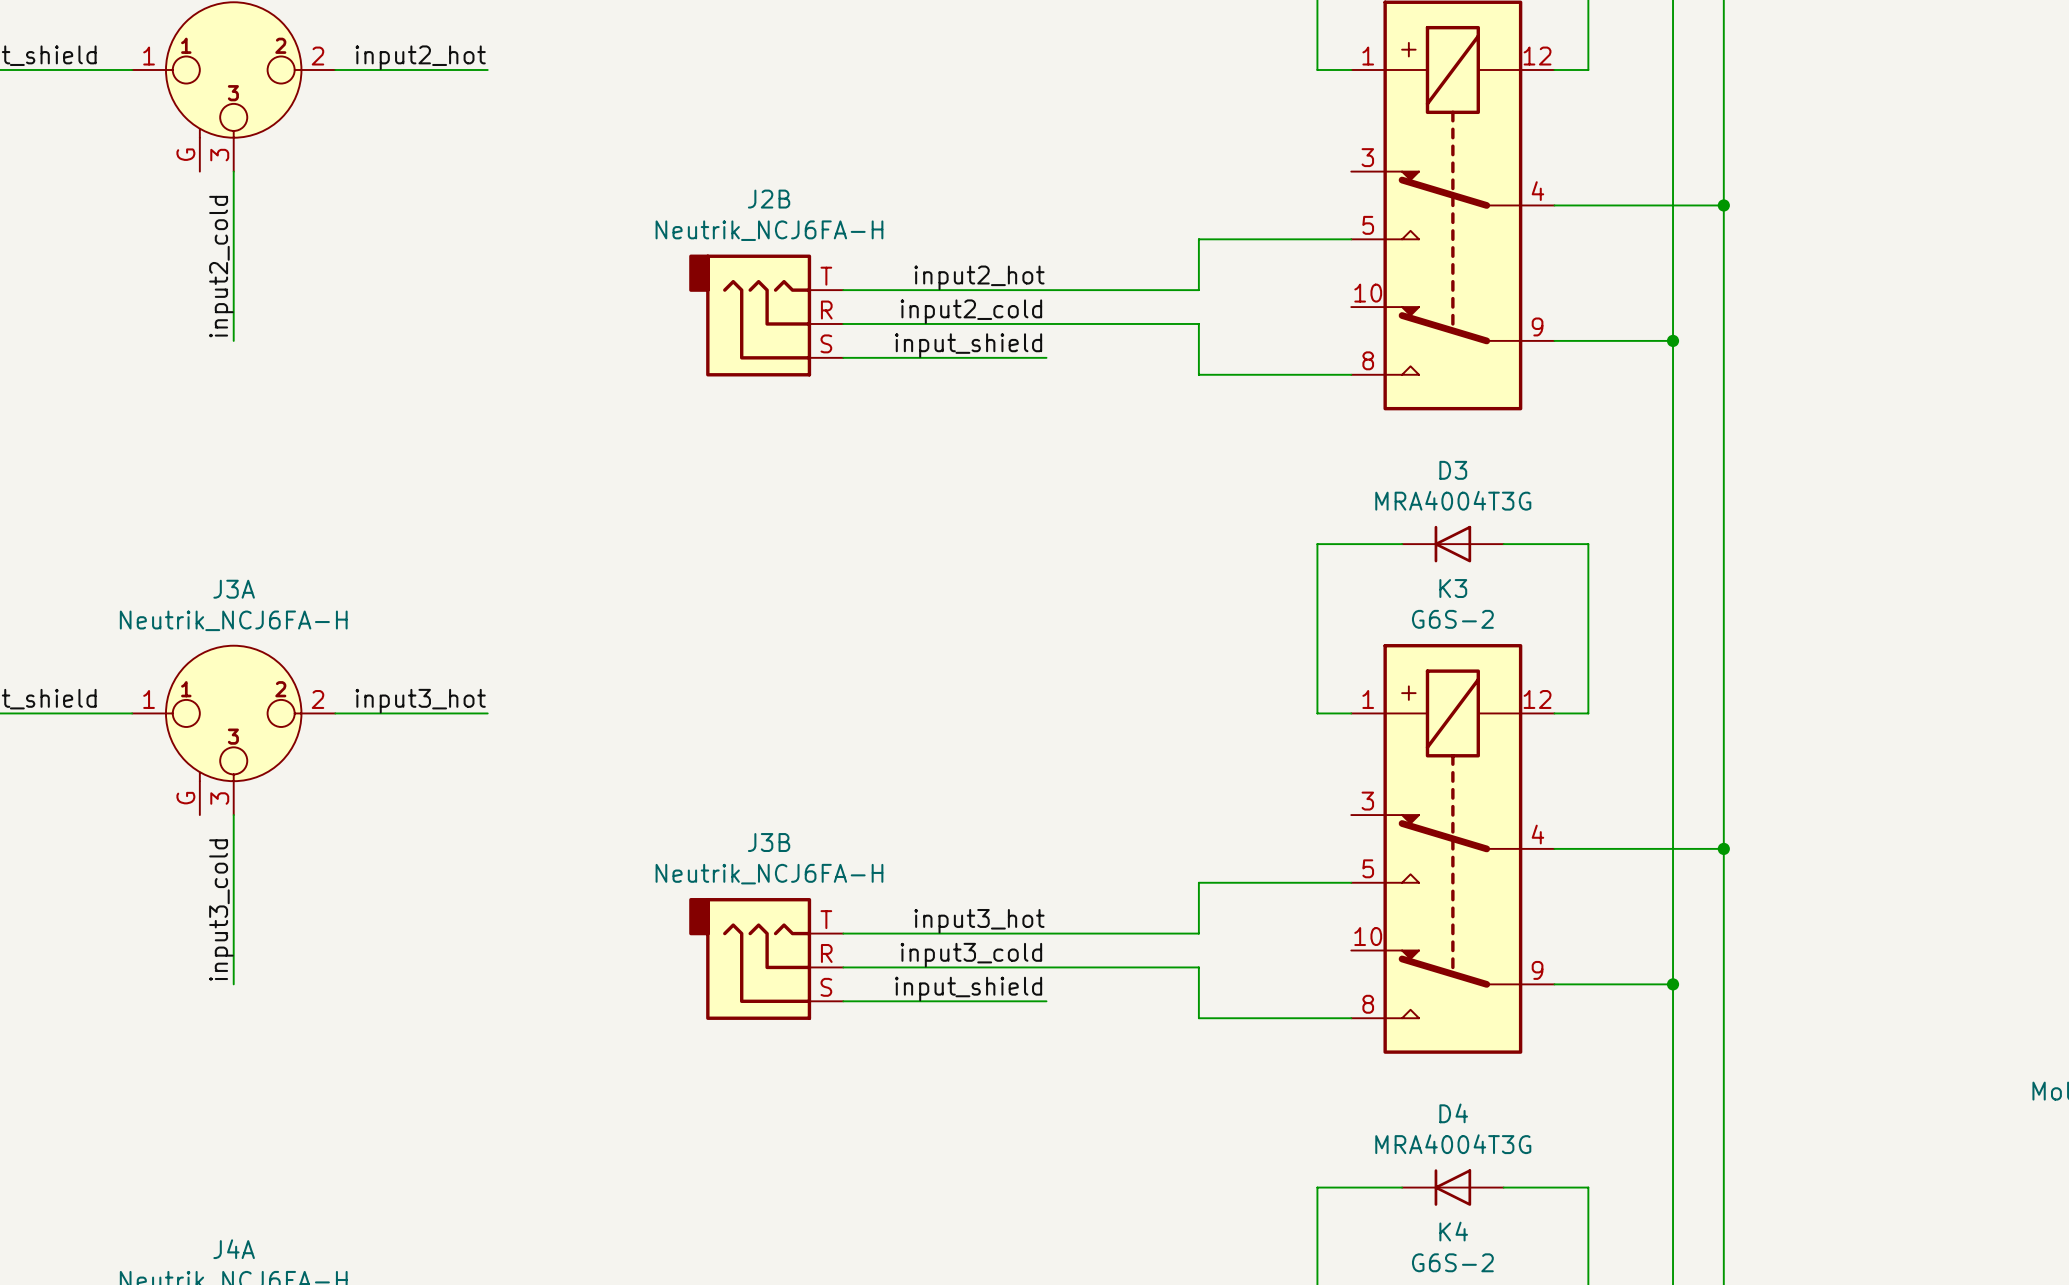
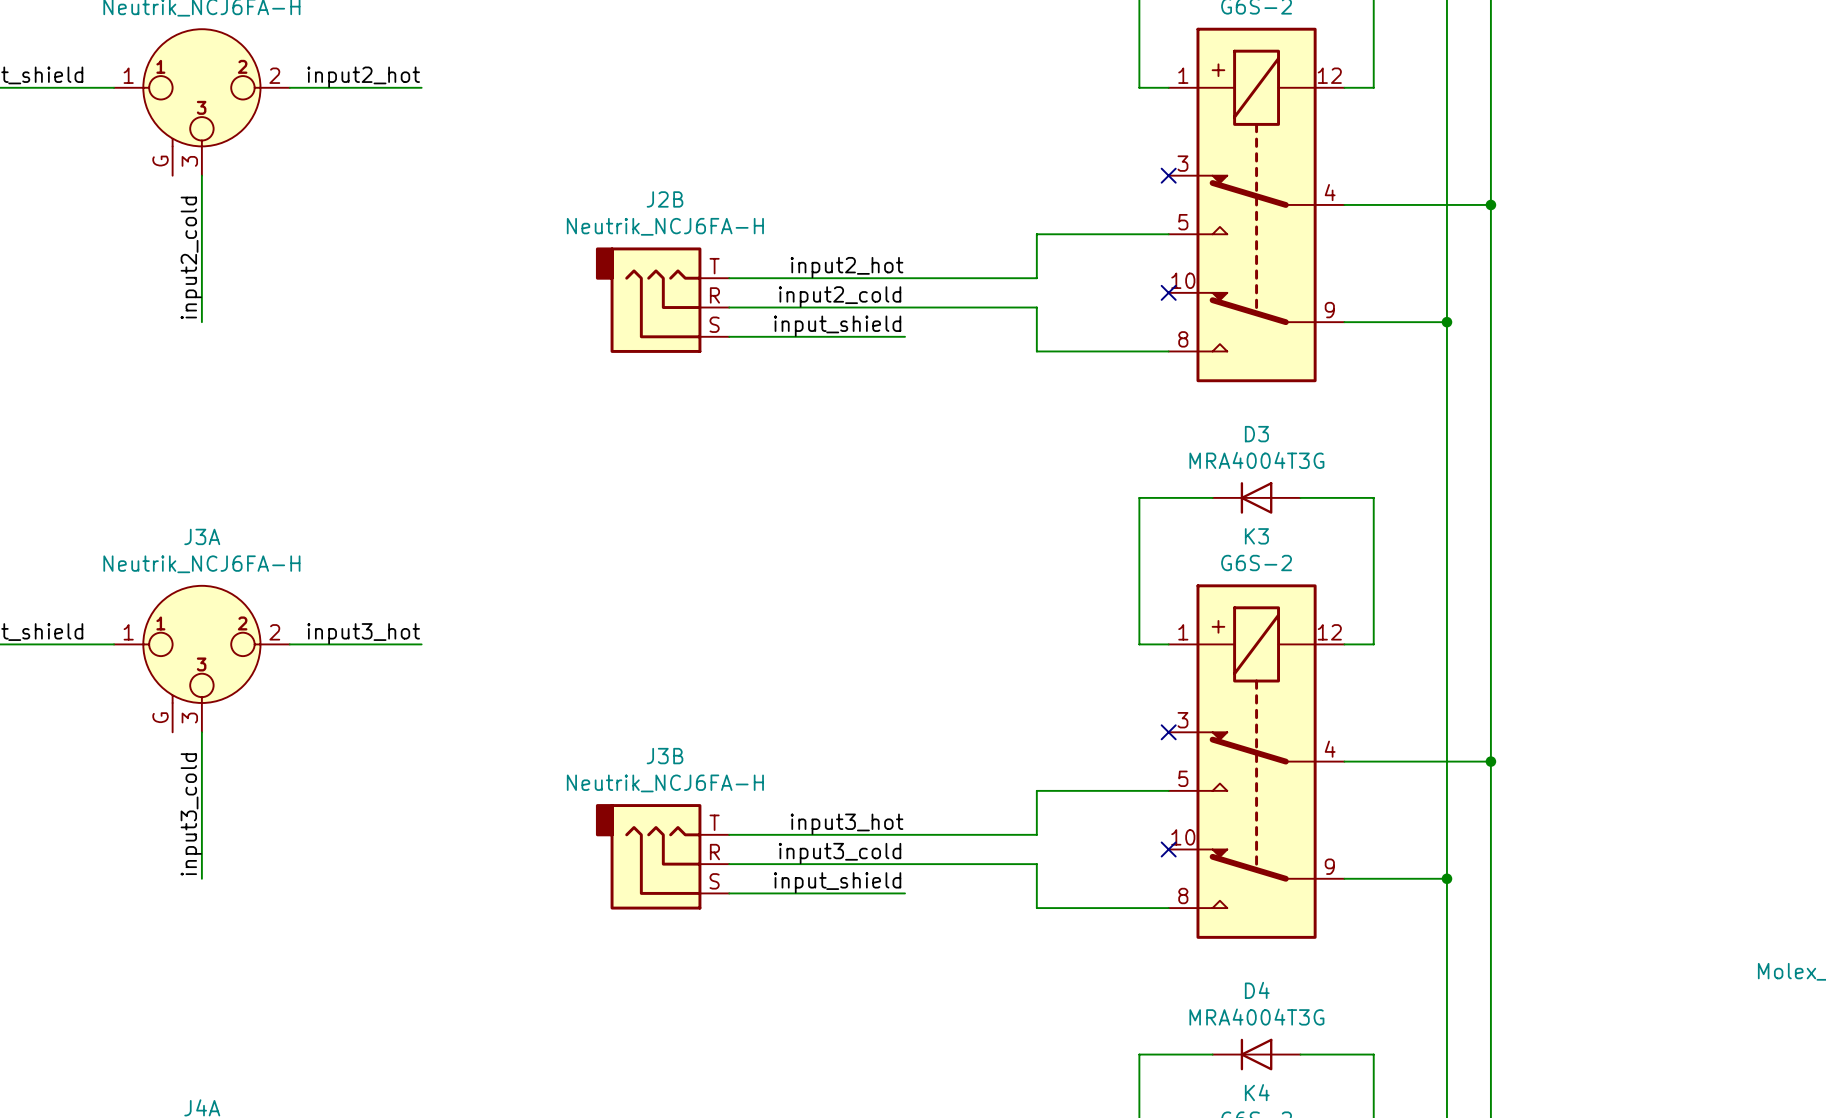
no-connect mark: none -> (1168, 175)
no-connect mark: none -> (1168, 292)
no-connect mark: none -> (1168, 732)
no-connect mark: none -> (1168, 849)

